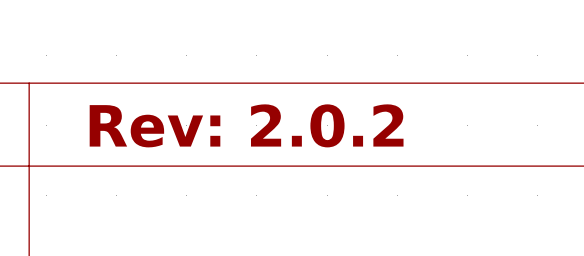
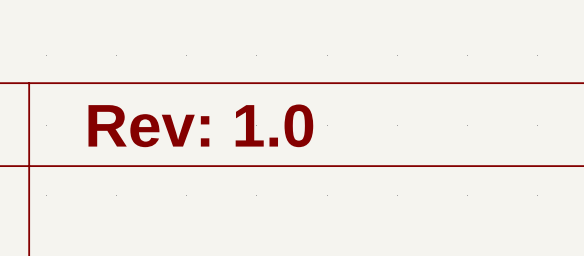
title block: Rev: 2.0.2 (246, 125) -> Rev: 1.0 (200, 125)

